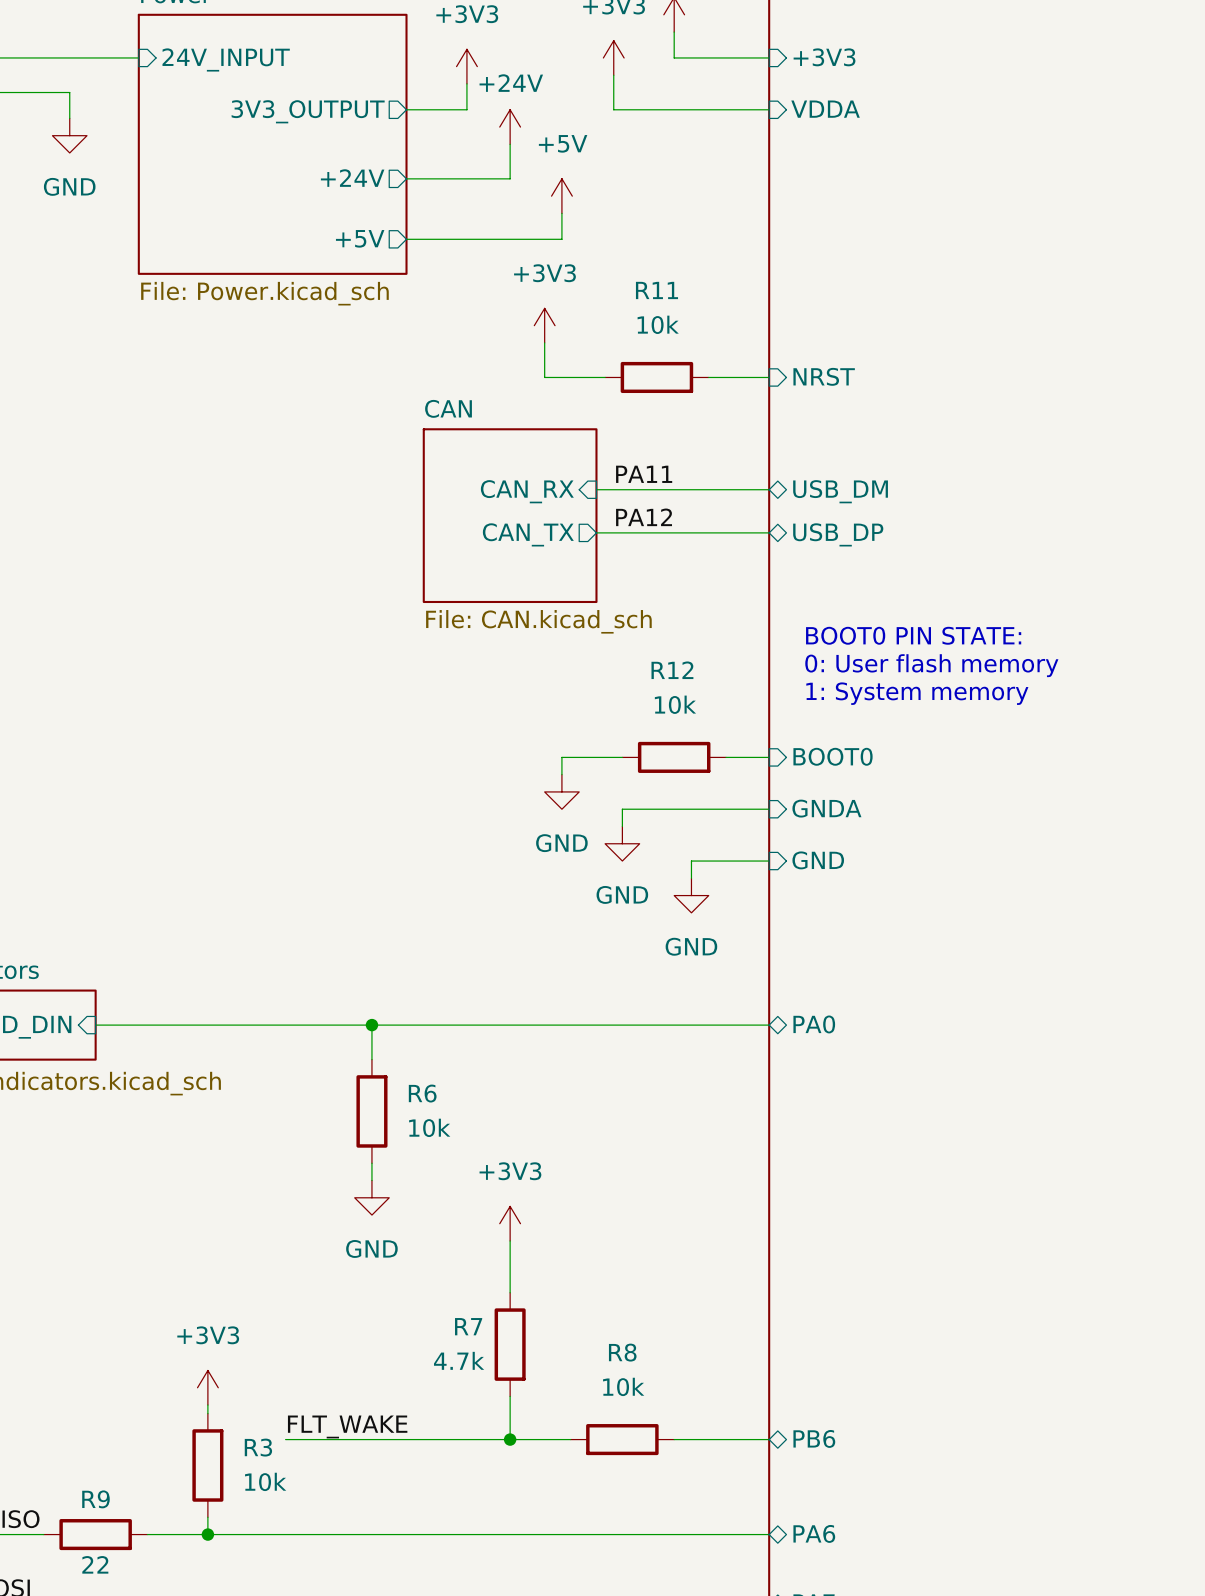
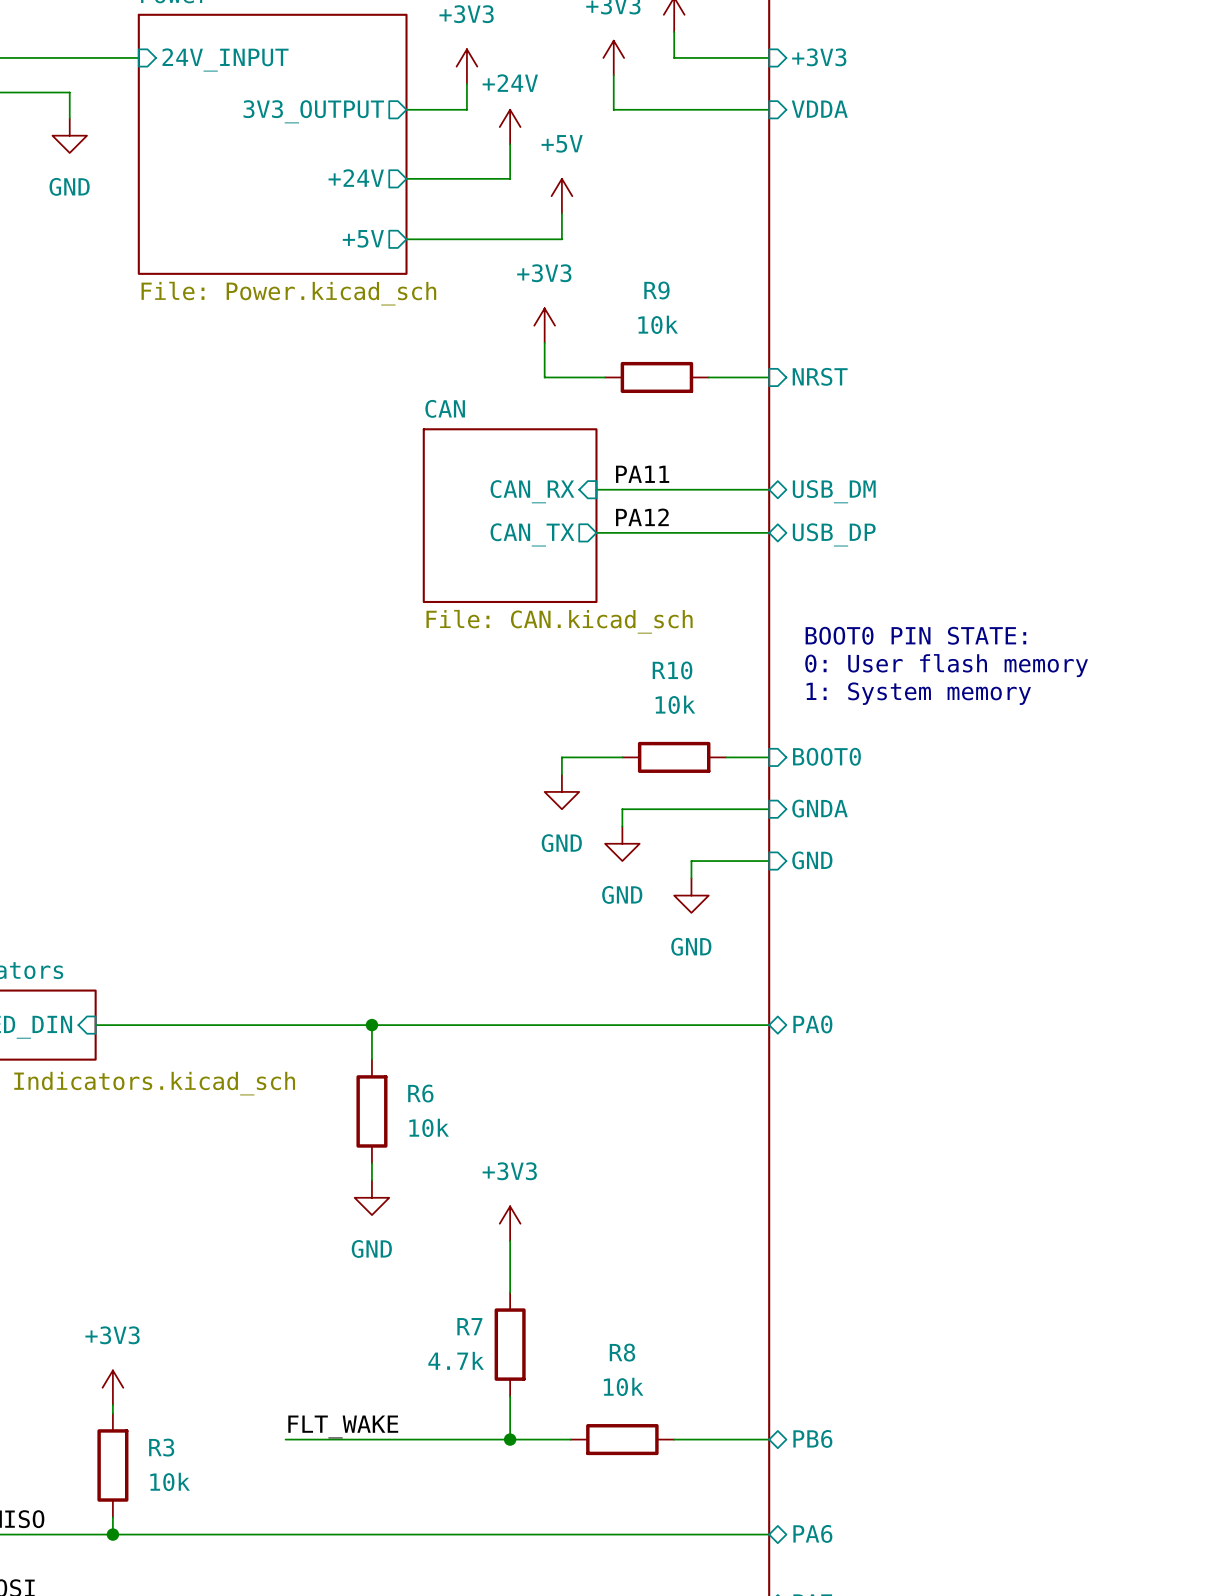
R11 name: R11 (656, 290) -> R9 (656, 290)
R12 name: R12 (672, 670) -> R10 (672, 670)
power symbol position: +3V3 (207, 1387) -> +3V3 (112, 1387)
wire: (207, 1405) (207, 1413) -> (112, 1405) (112, 1413)
R3 position: (207, 1465) -> (112, 1465)
wire: (207, 1517) (207, 1534) -> (112, 1517) (112, 1534)
wire: none -> (43, 1534) (147, 1534)
R9: 22 (95, 1534) -> none
junction: none -> (112, 1534)
junction: (207, 1534) -> none

